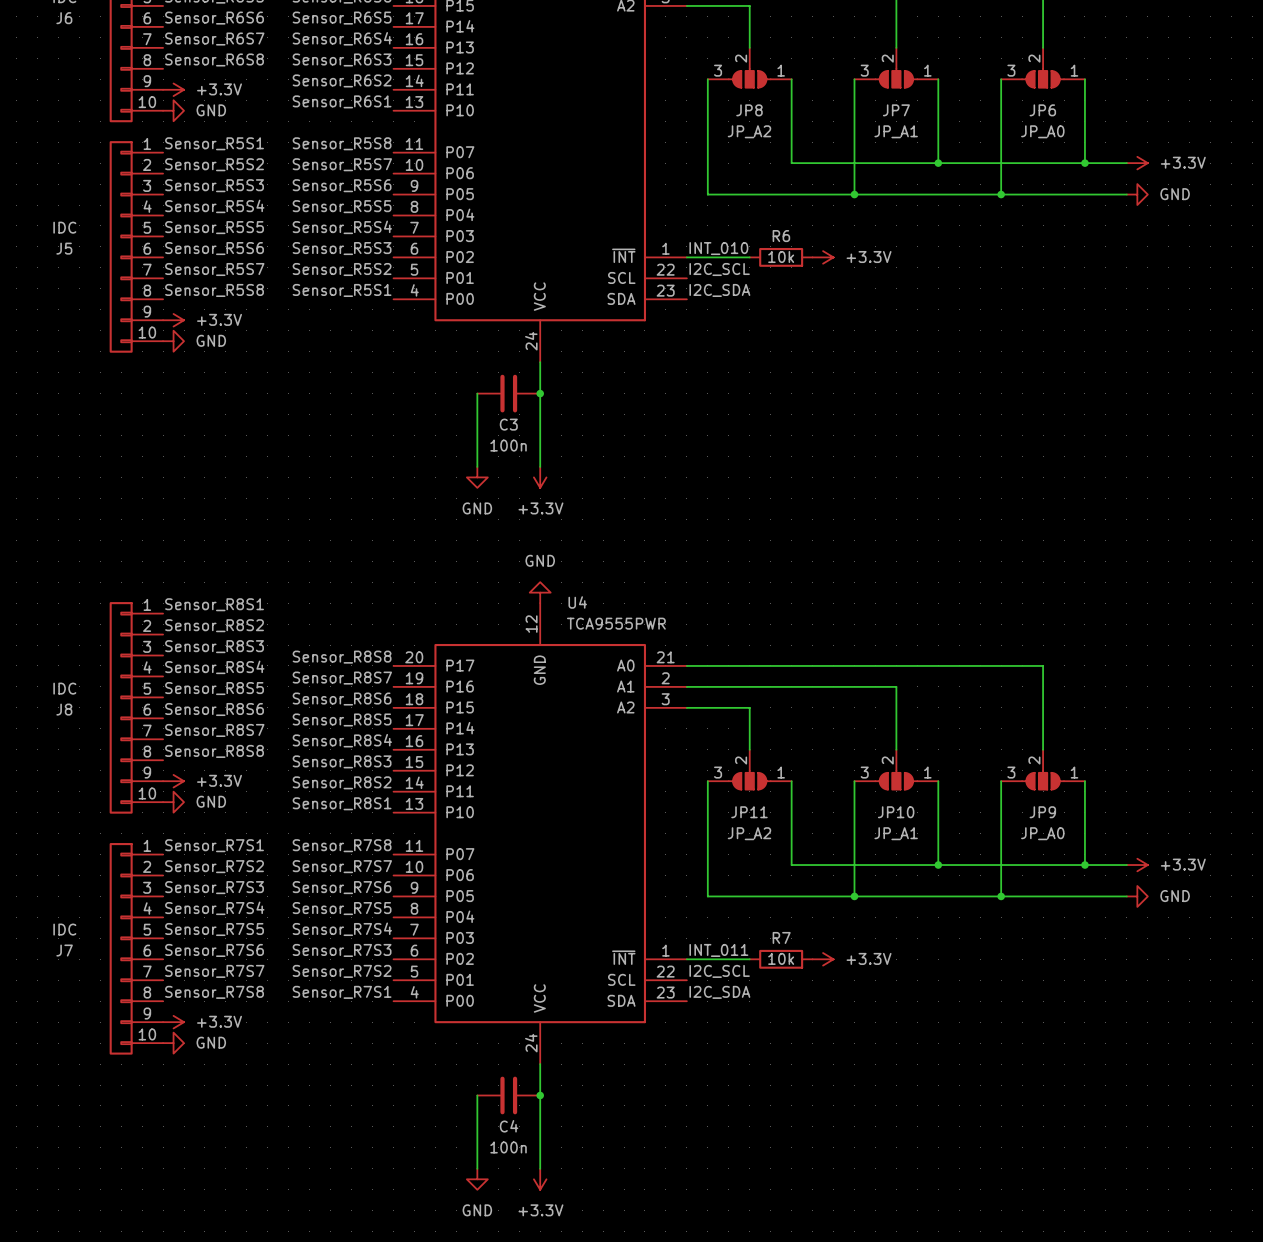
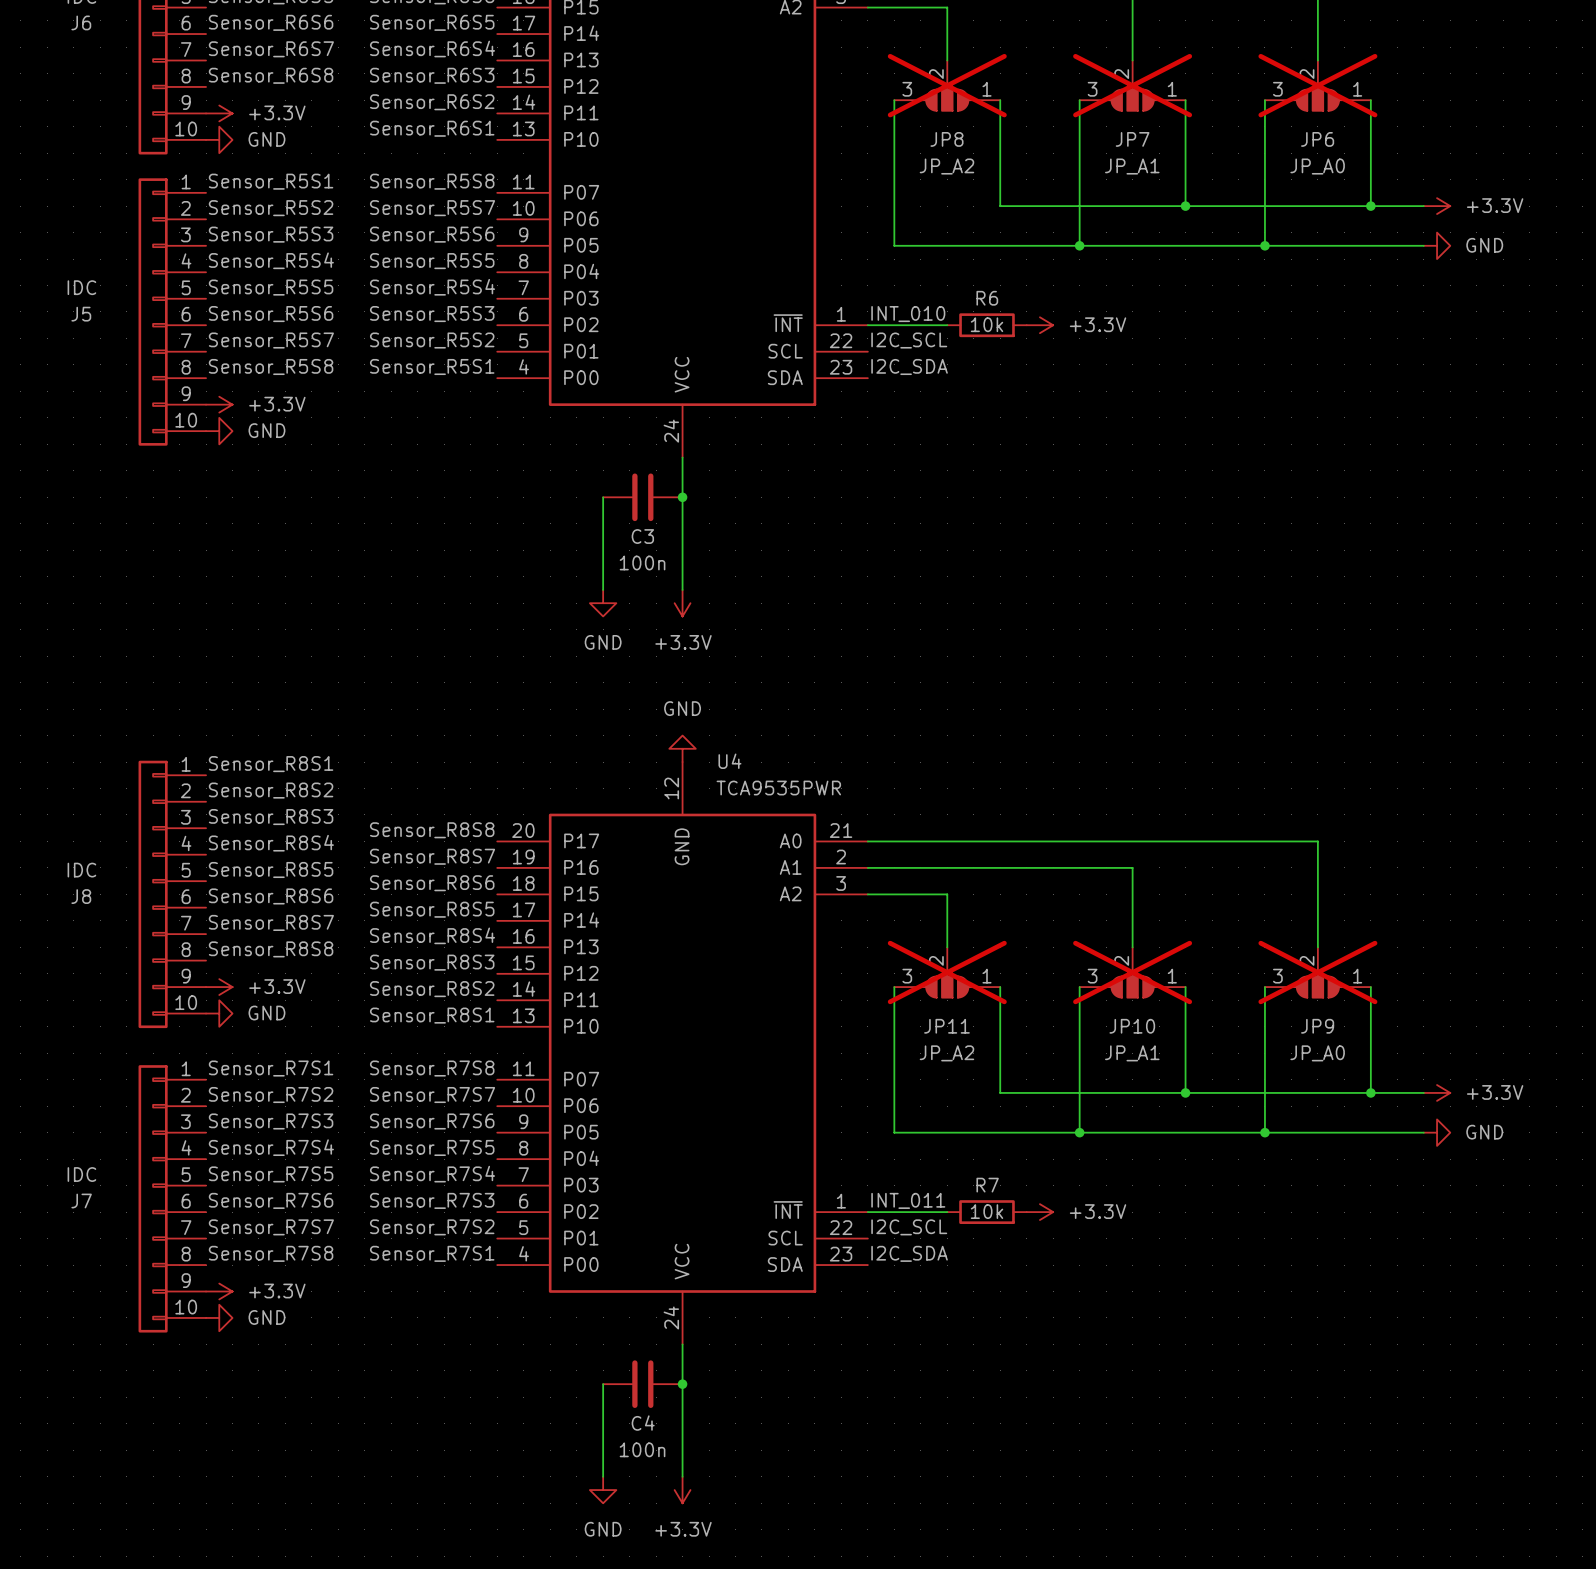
JP8 do-not-place cross: none -> (947, 85)
JP7 do-not-place cross: none -> (1132, 85)
JP6 do-not-place cross: none -> (1317, 85)
U4 value: TCA9555PWR (616, 623) -> TCA9535PWR (778, 788)
JP11 do-not-place cross: none -> (947, 972)
JP10 do-not-place cross: none -> (1132, 972)
JP9 do-not-place cross: none -> (1317, 972)

